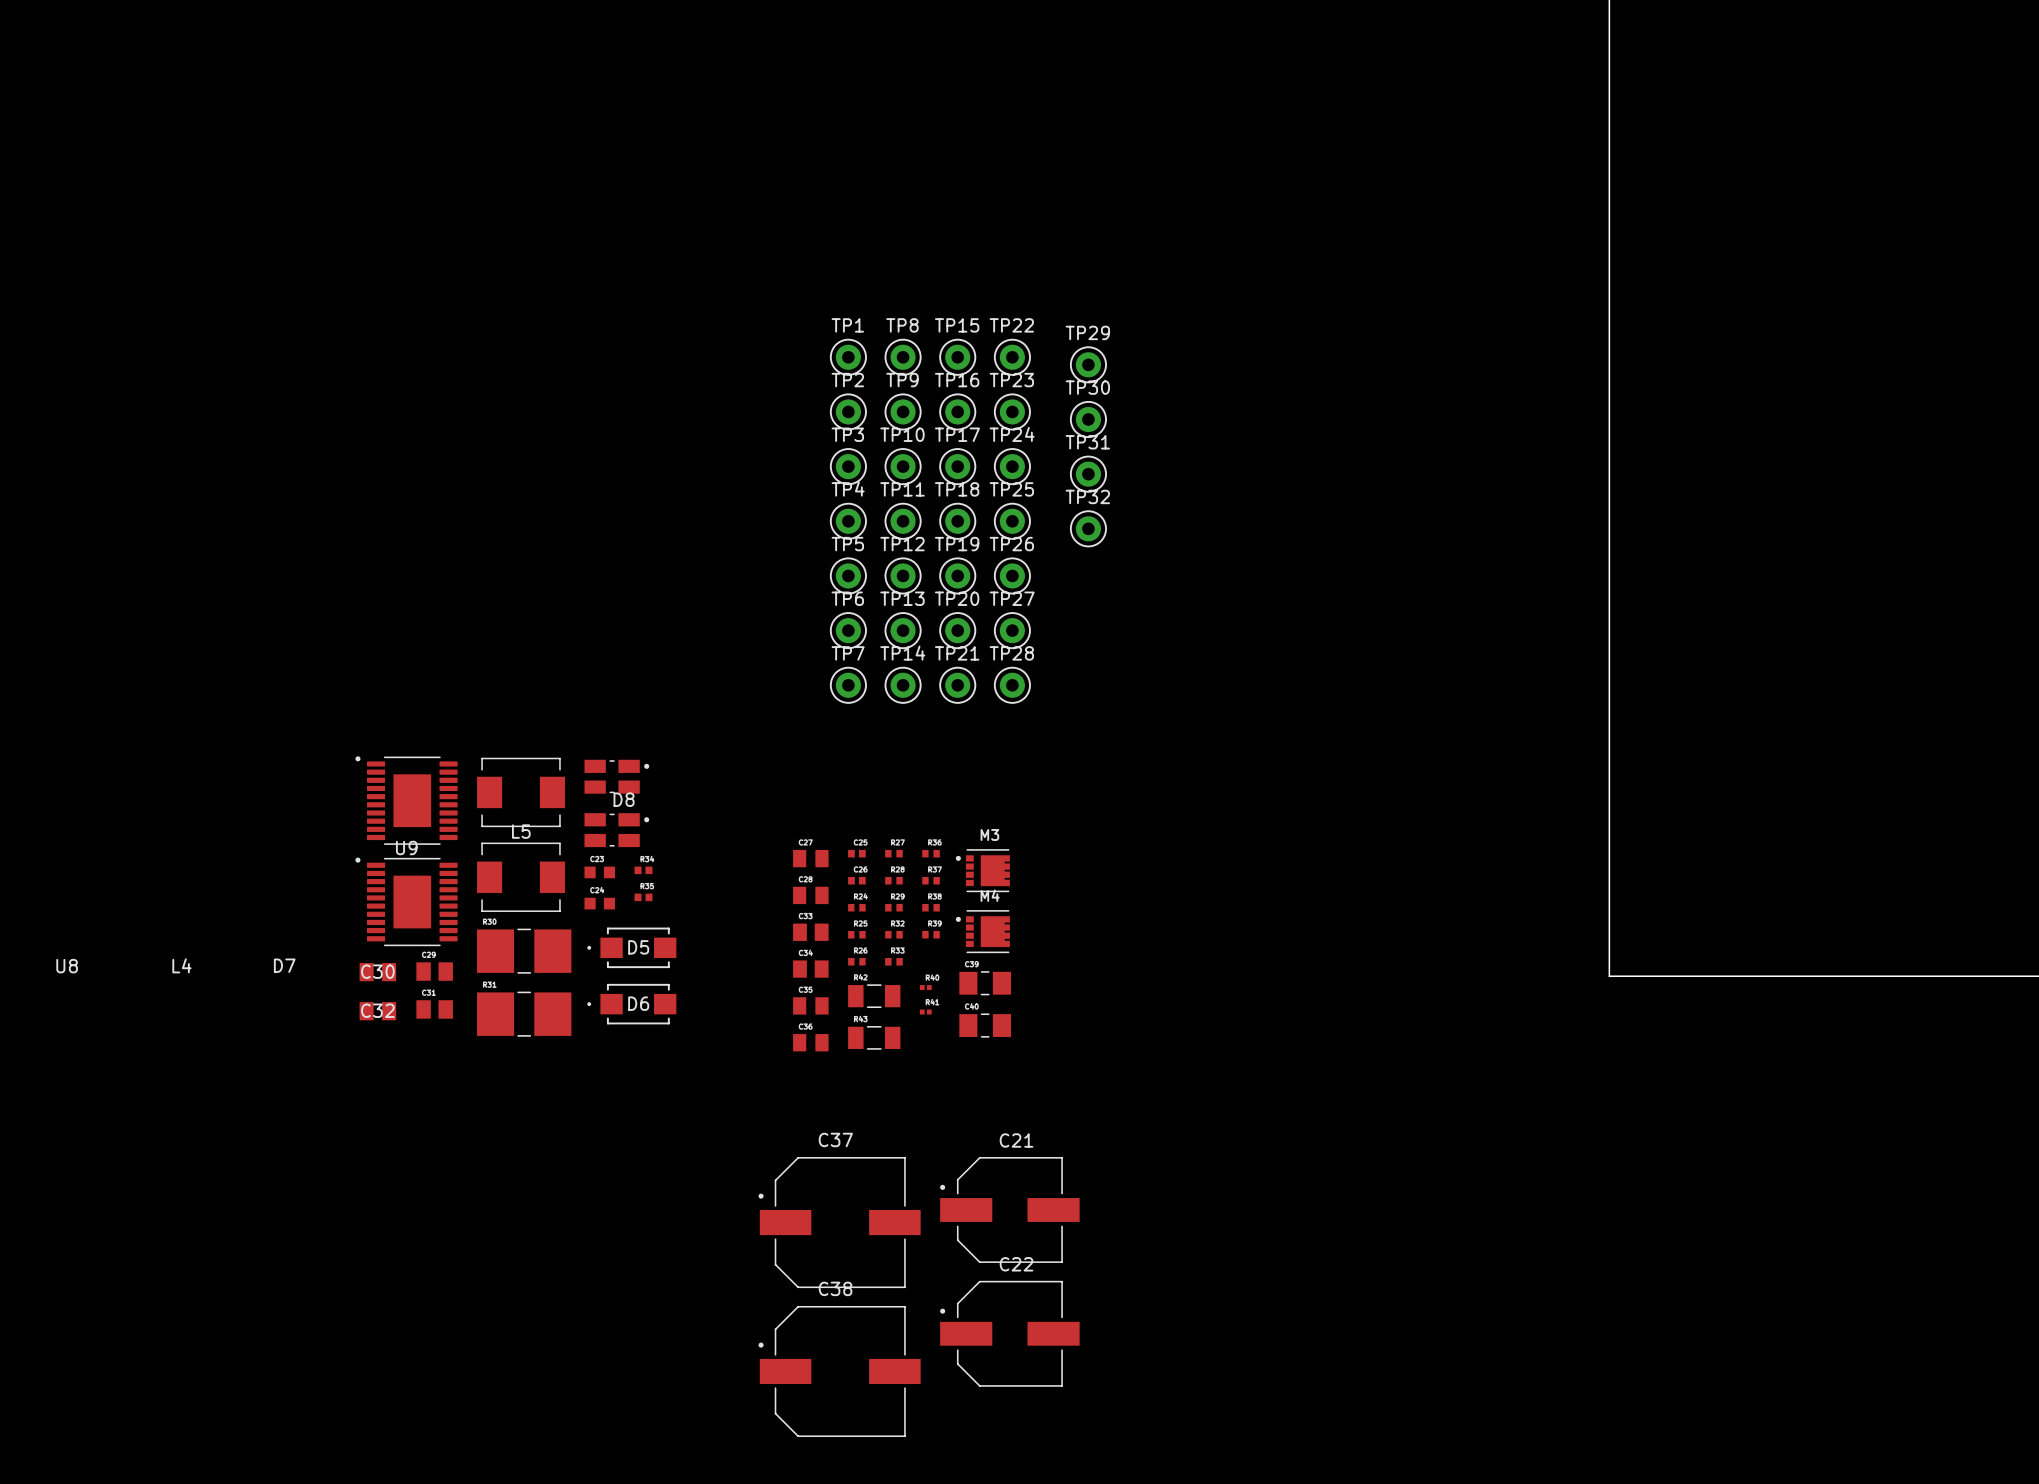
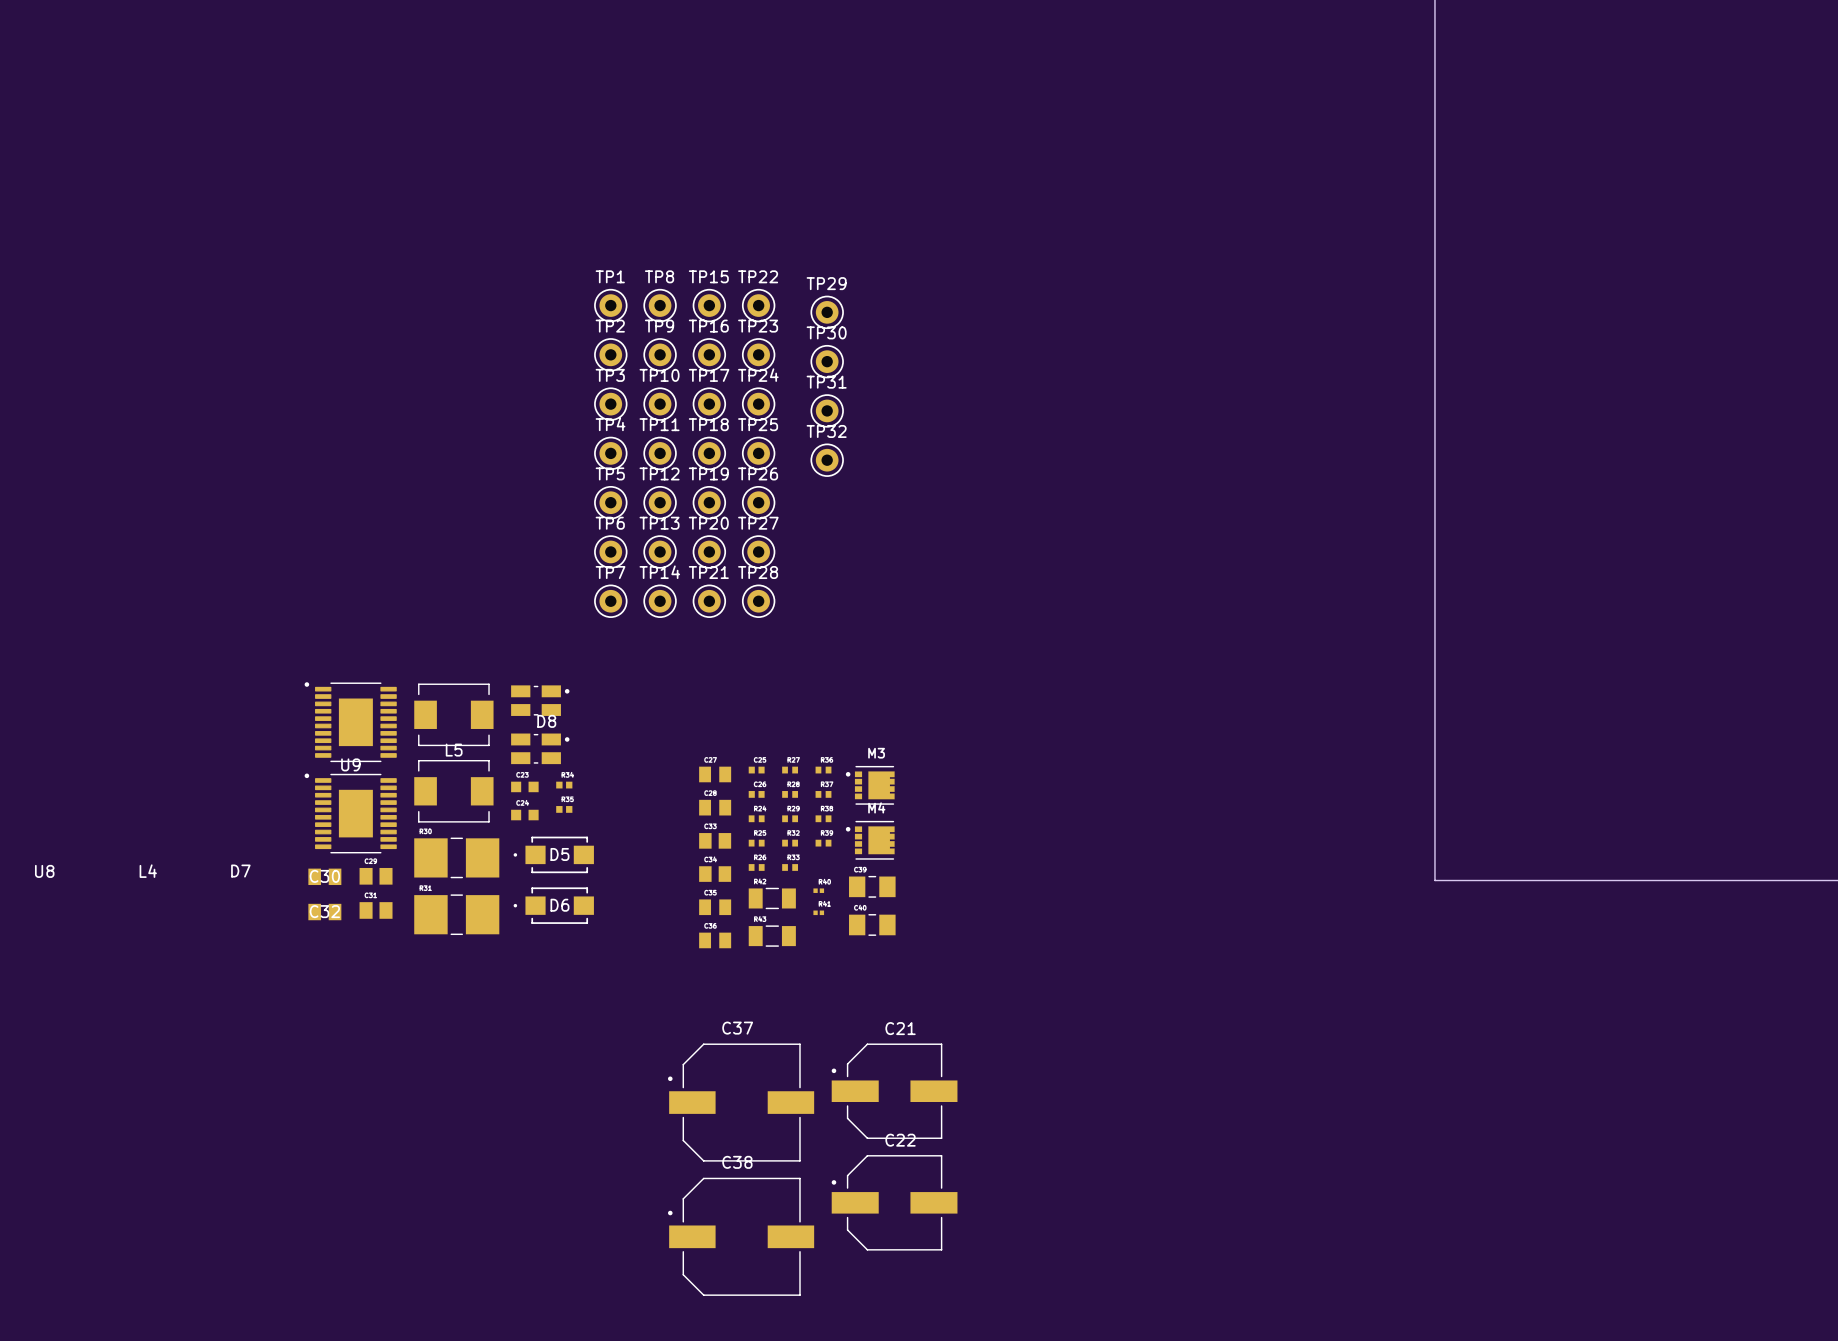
TP1 position: (848, 357) -> (610, 305)
TP8 position: (903, 357) -> (660, 305)
TP15 position: (957, 357) -> (709, 305)
TP22 position: (1012, 357) -> (758, 305)
TP29 position: (1088, 364) -> (827, 312)
TP2 position: (848, 411) -> (610, 354)
TP9 position: (903, 411) -> (660, 354)
TP16 position: (957, 411) -> (709, 354)
TP23 position: (1012, 411) -> (758, 354)
TP30 position: (1088, 419) -> (827, 361)
TP3 position: (848, 466) -> (610, 404)
TP10 position: (903, 466) -> (660, 404)
TP17 position: (957, 466) -> (709, 404)
TP24 position: (1012, 466) -> (758, 404)
TP31 position: (1088, 474) -> (827, 410)
TP4 position: (848, 521) -> (610, 453)
TP11 position: (903, 521) -> (660, 453)
TP18 position: (957, 521) -> (709, 453)
TP25 position: (1012, 521) -> (758, 453)
TP32 position: (1088, 528) -> (827, 460)
TP5 position: (848, 575) -> (610, 502)
TP12 position: (903, 575) -> (660, 502)
TP19 position: (957, 575) -> (709, 502)
TP26 position: (1012, 575) -> (758, 502)
TP6 position: (848, 630) -> (610, 551)
TP13 position: (903, 630) -> (660, 551)
TP20 position: (957, 630) -> (709, 551)
TP27 position: (1012, 630) -> (758, 551)
TP7 position: (848, 685) -> (610, 601)
TP14 position: (903, 685) -> (660, 601)
TP21 position: (957, 685) -> (709, 601)
TP28 position: (1012, 685) -> (758, 601)

